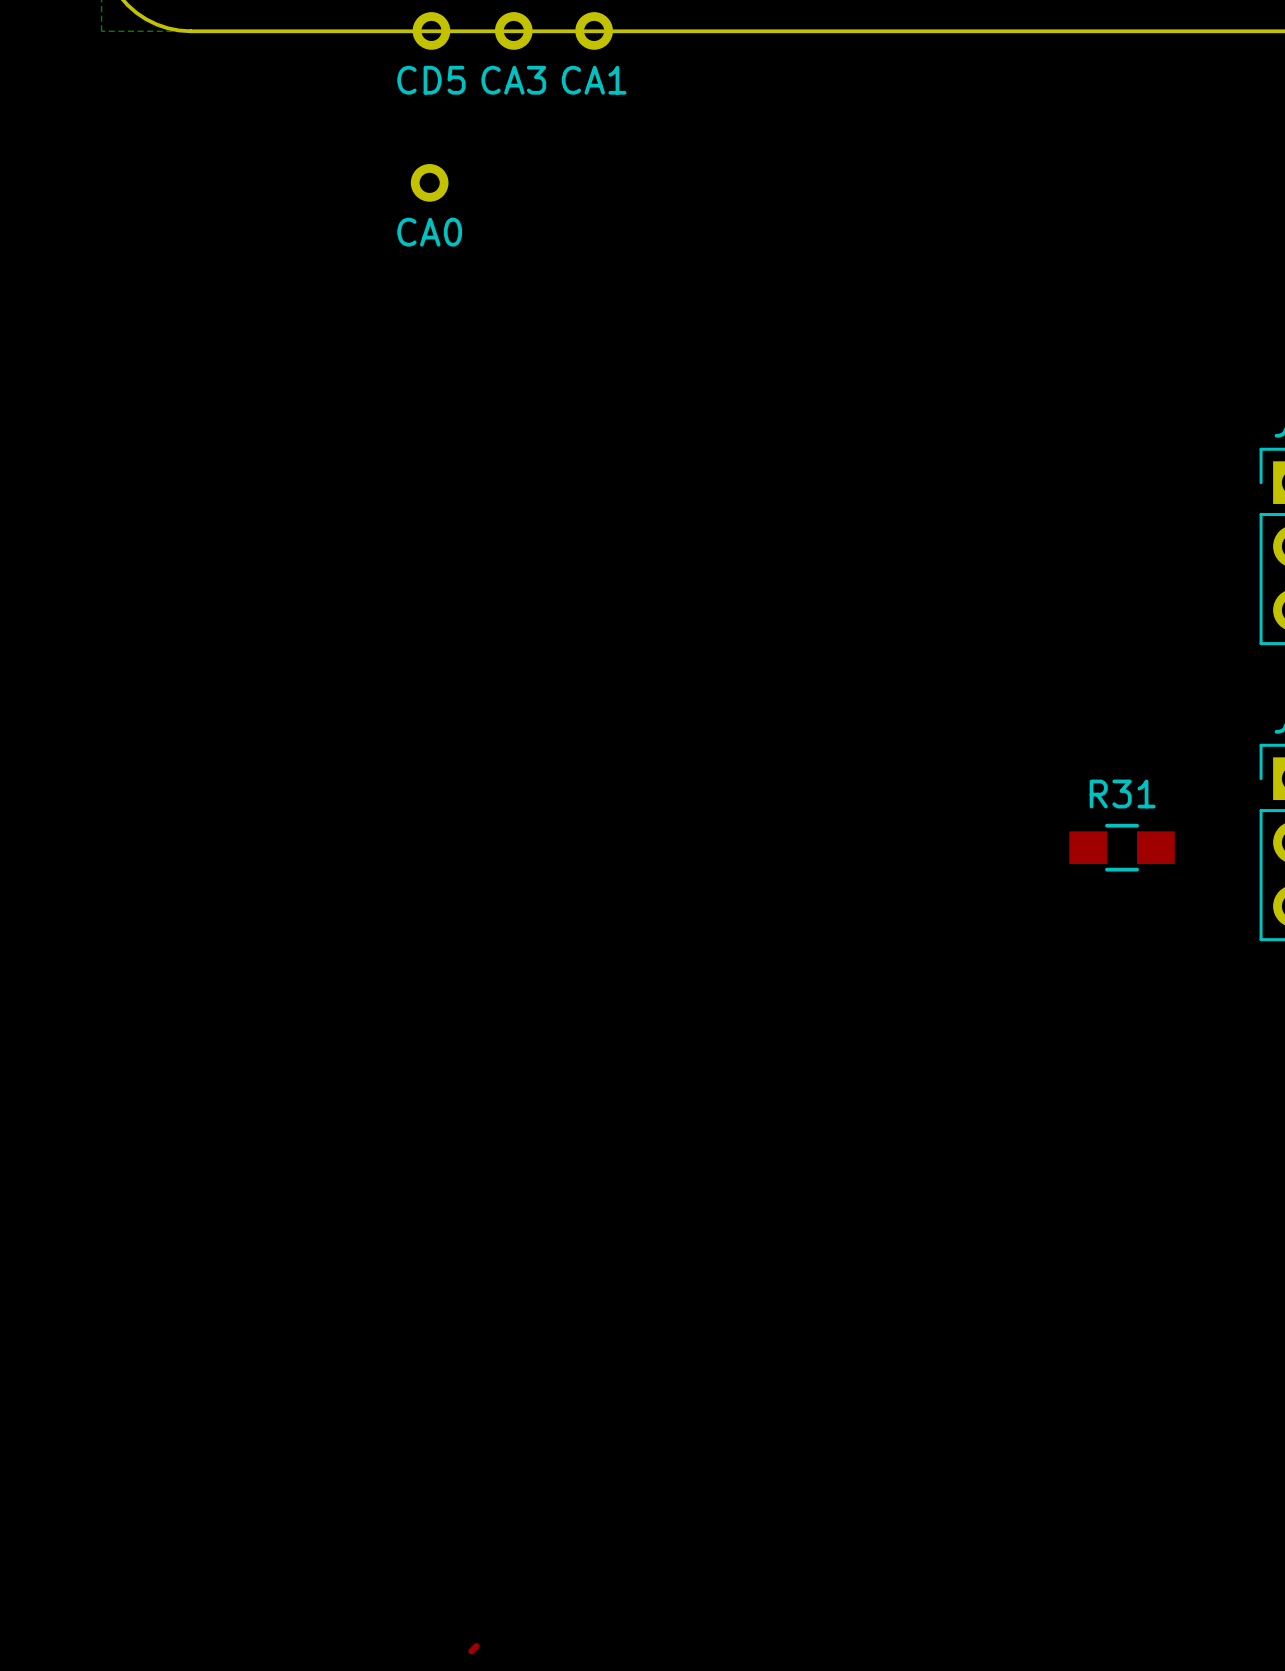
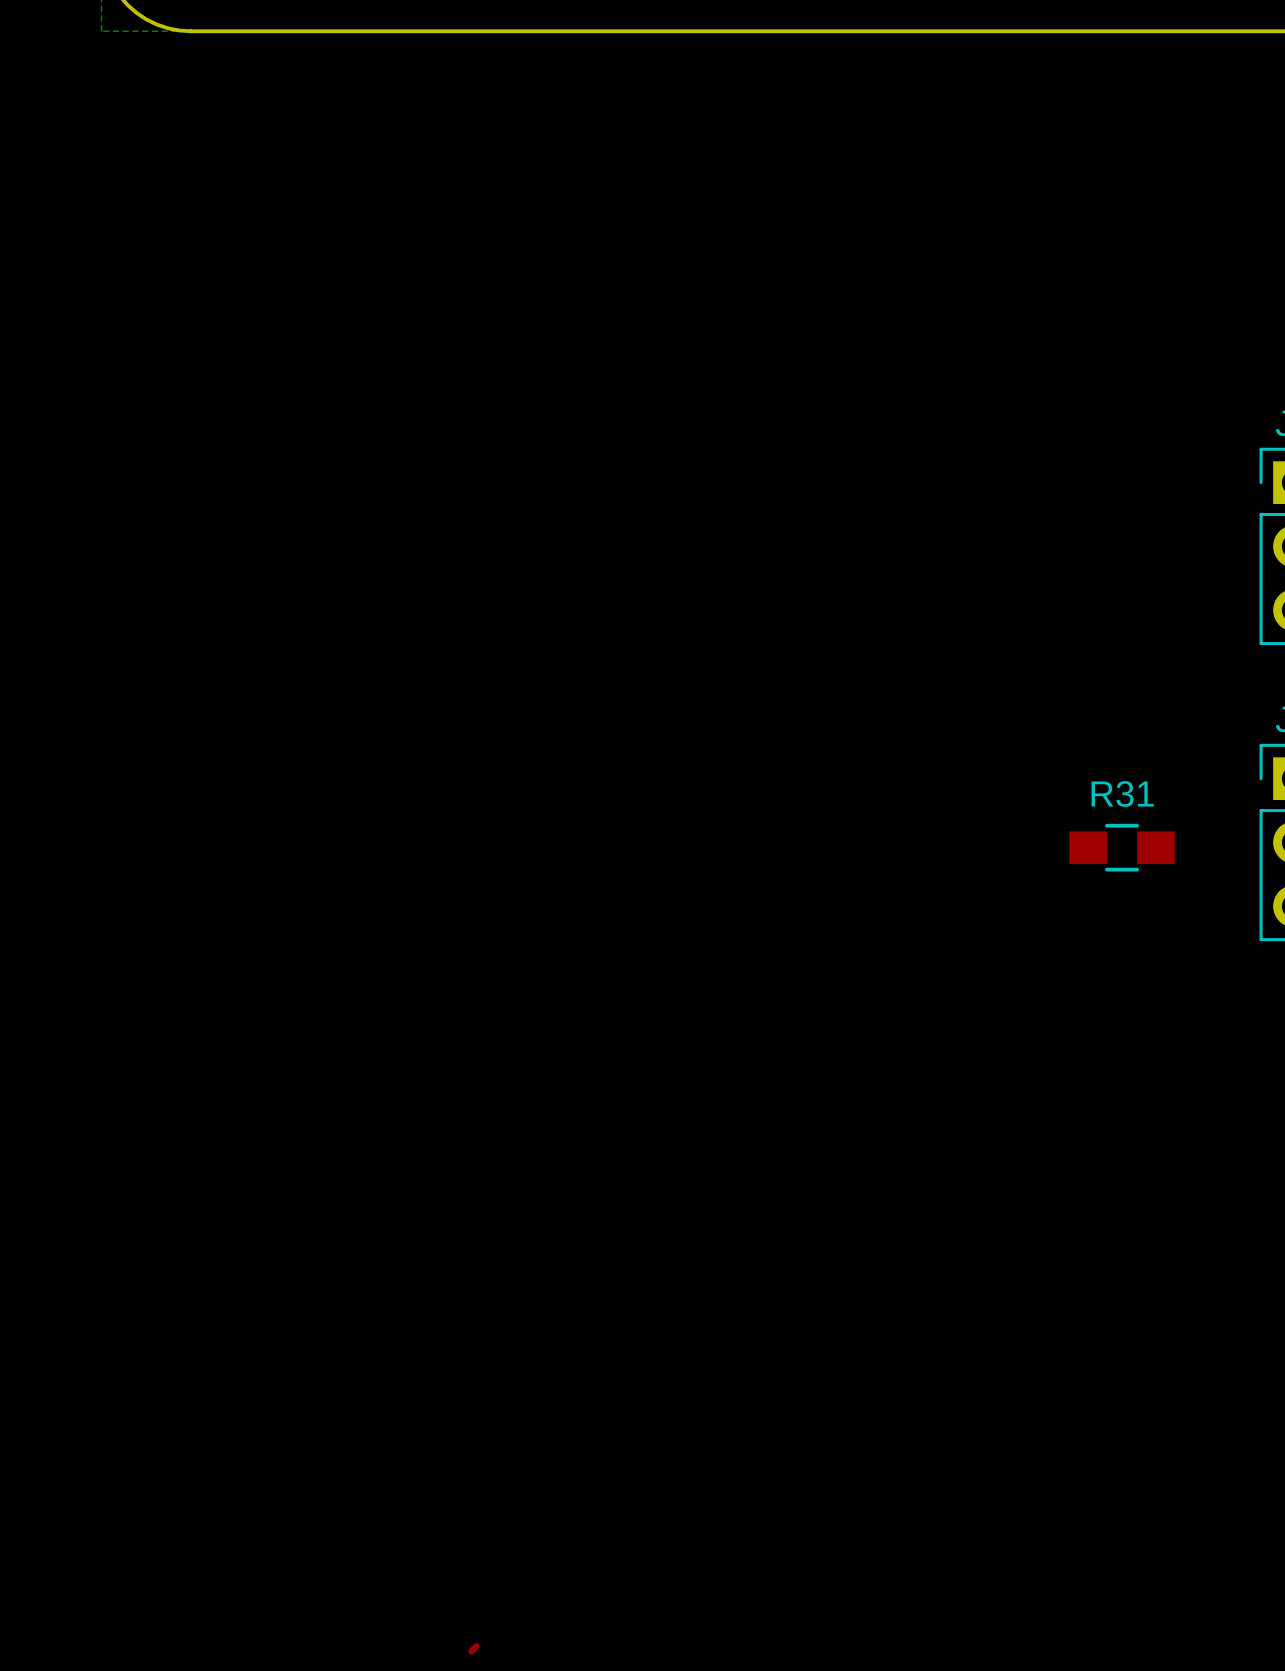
CD5: (431, 30) -> none
CA3: (513, 30) -> none
CA1: (594, 30) -> none
CA0: (429, 182) -> none

